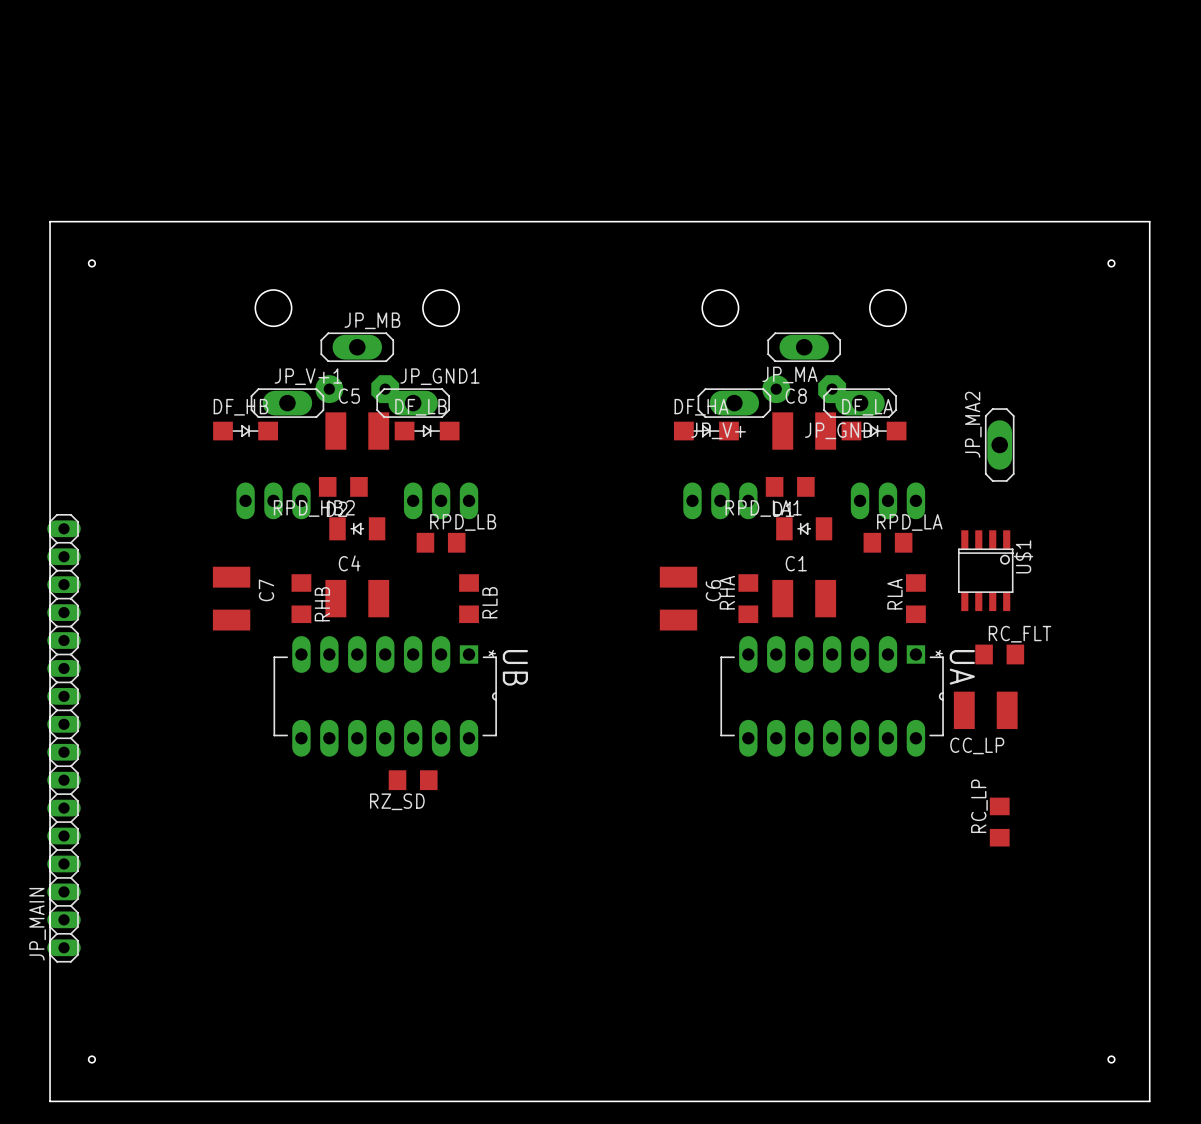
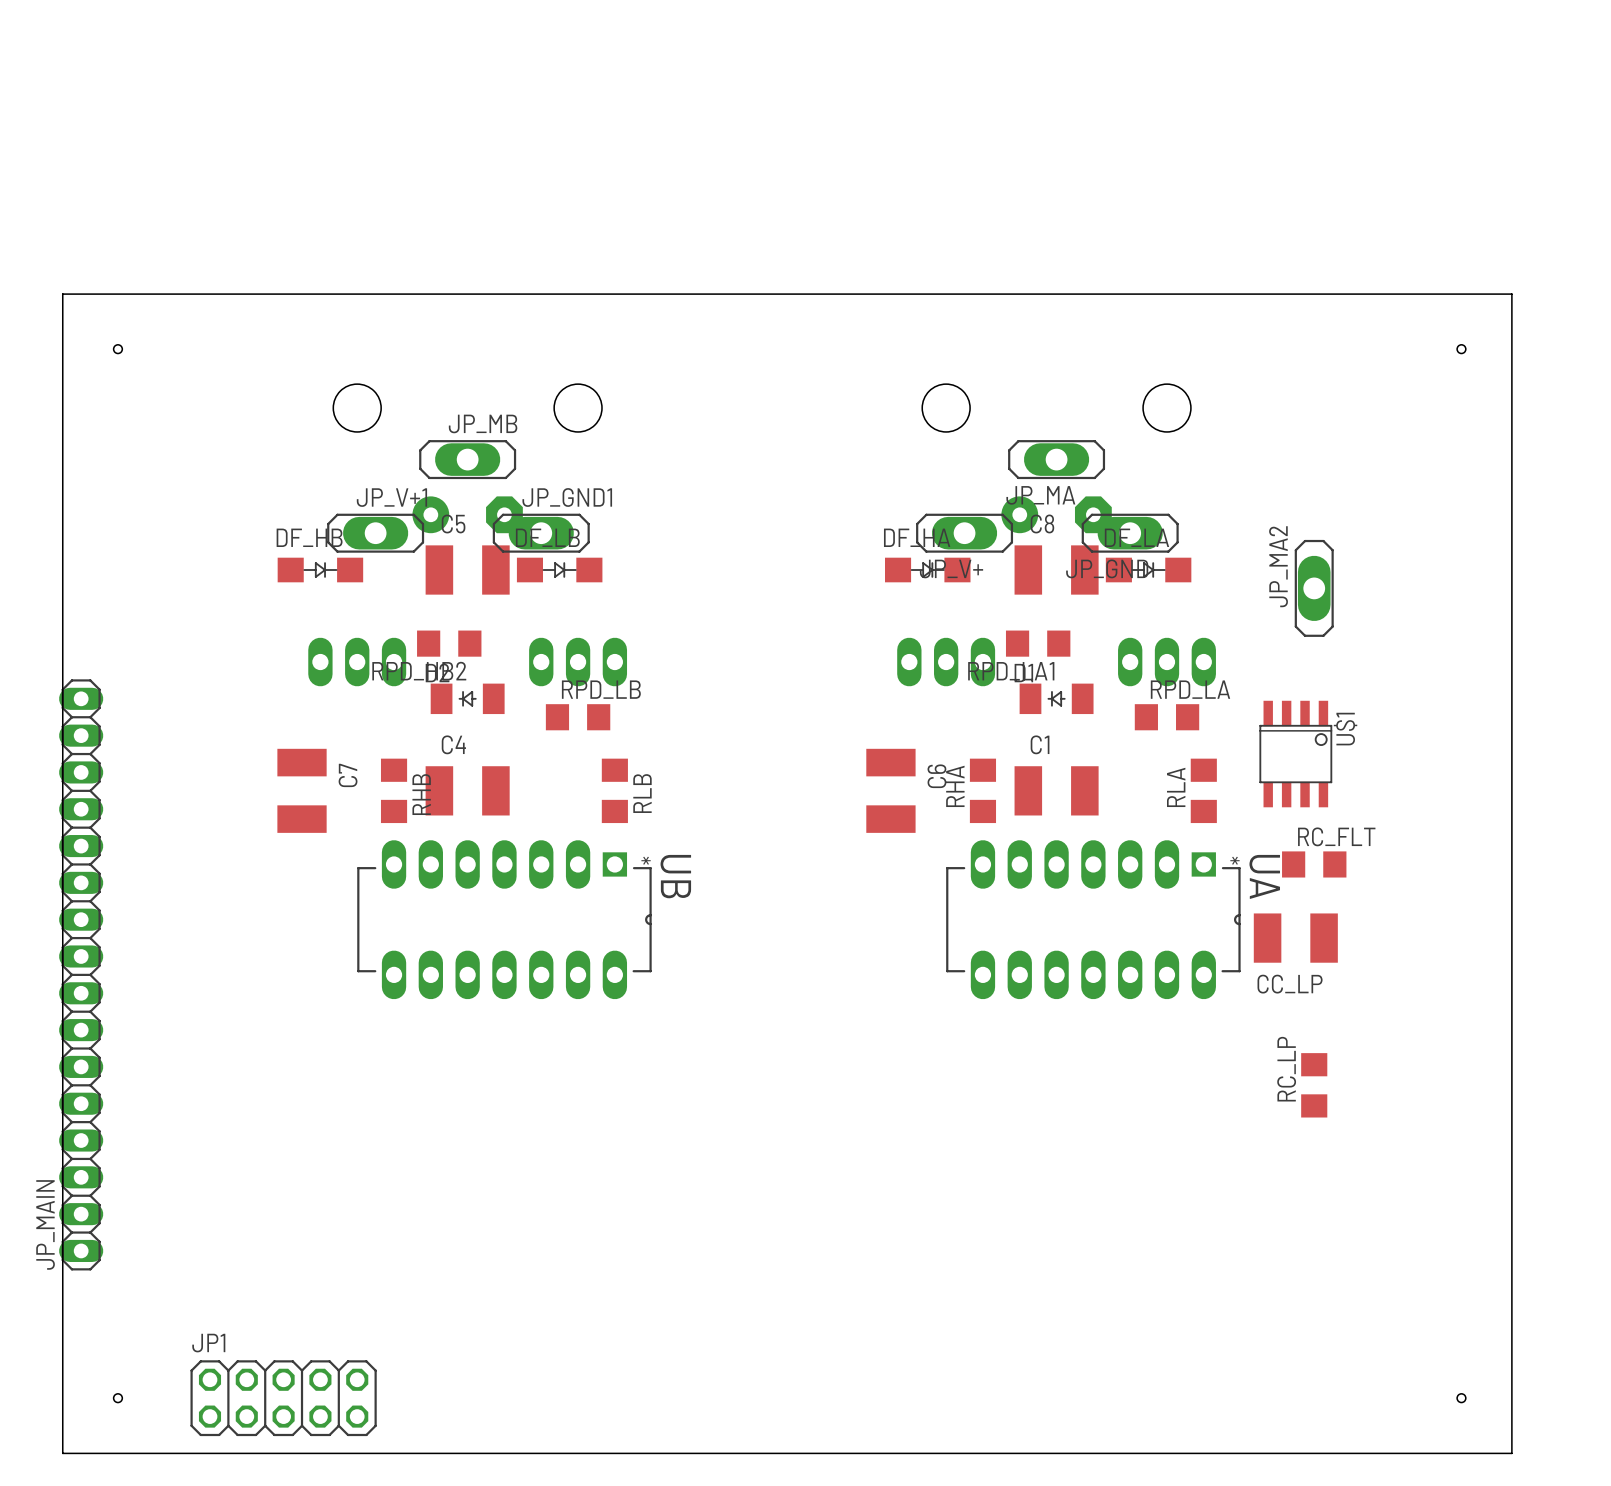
RZ_SD: (413, 780) -> none
JP1: none -> (283, 1398)

